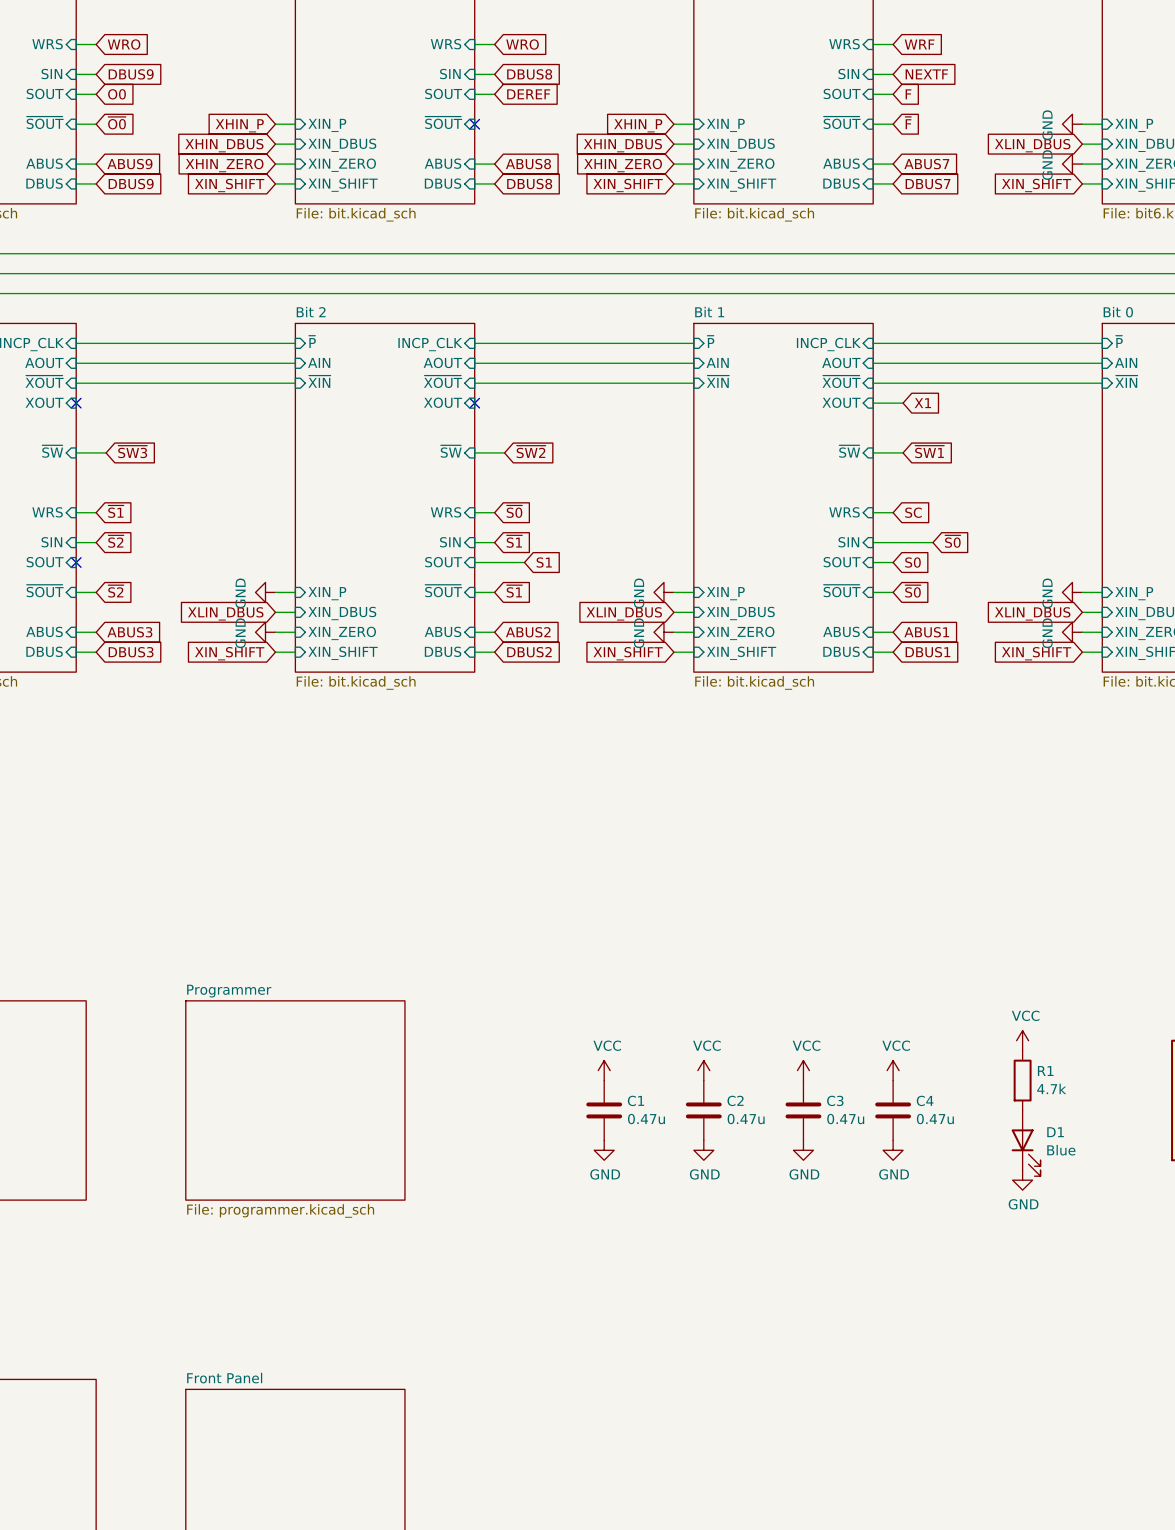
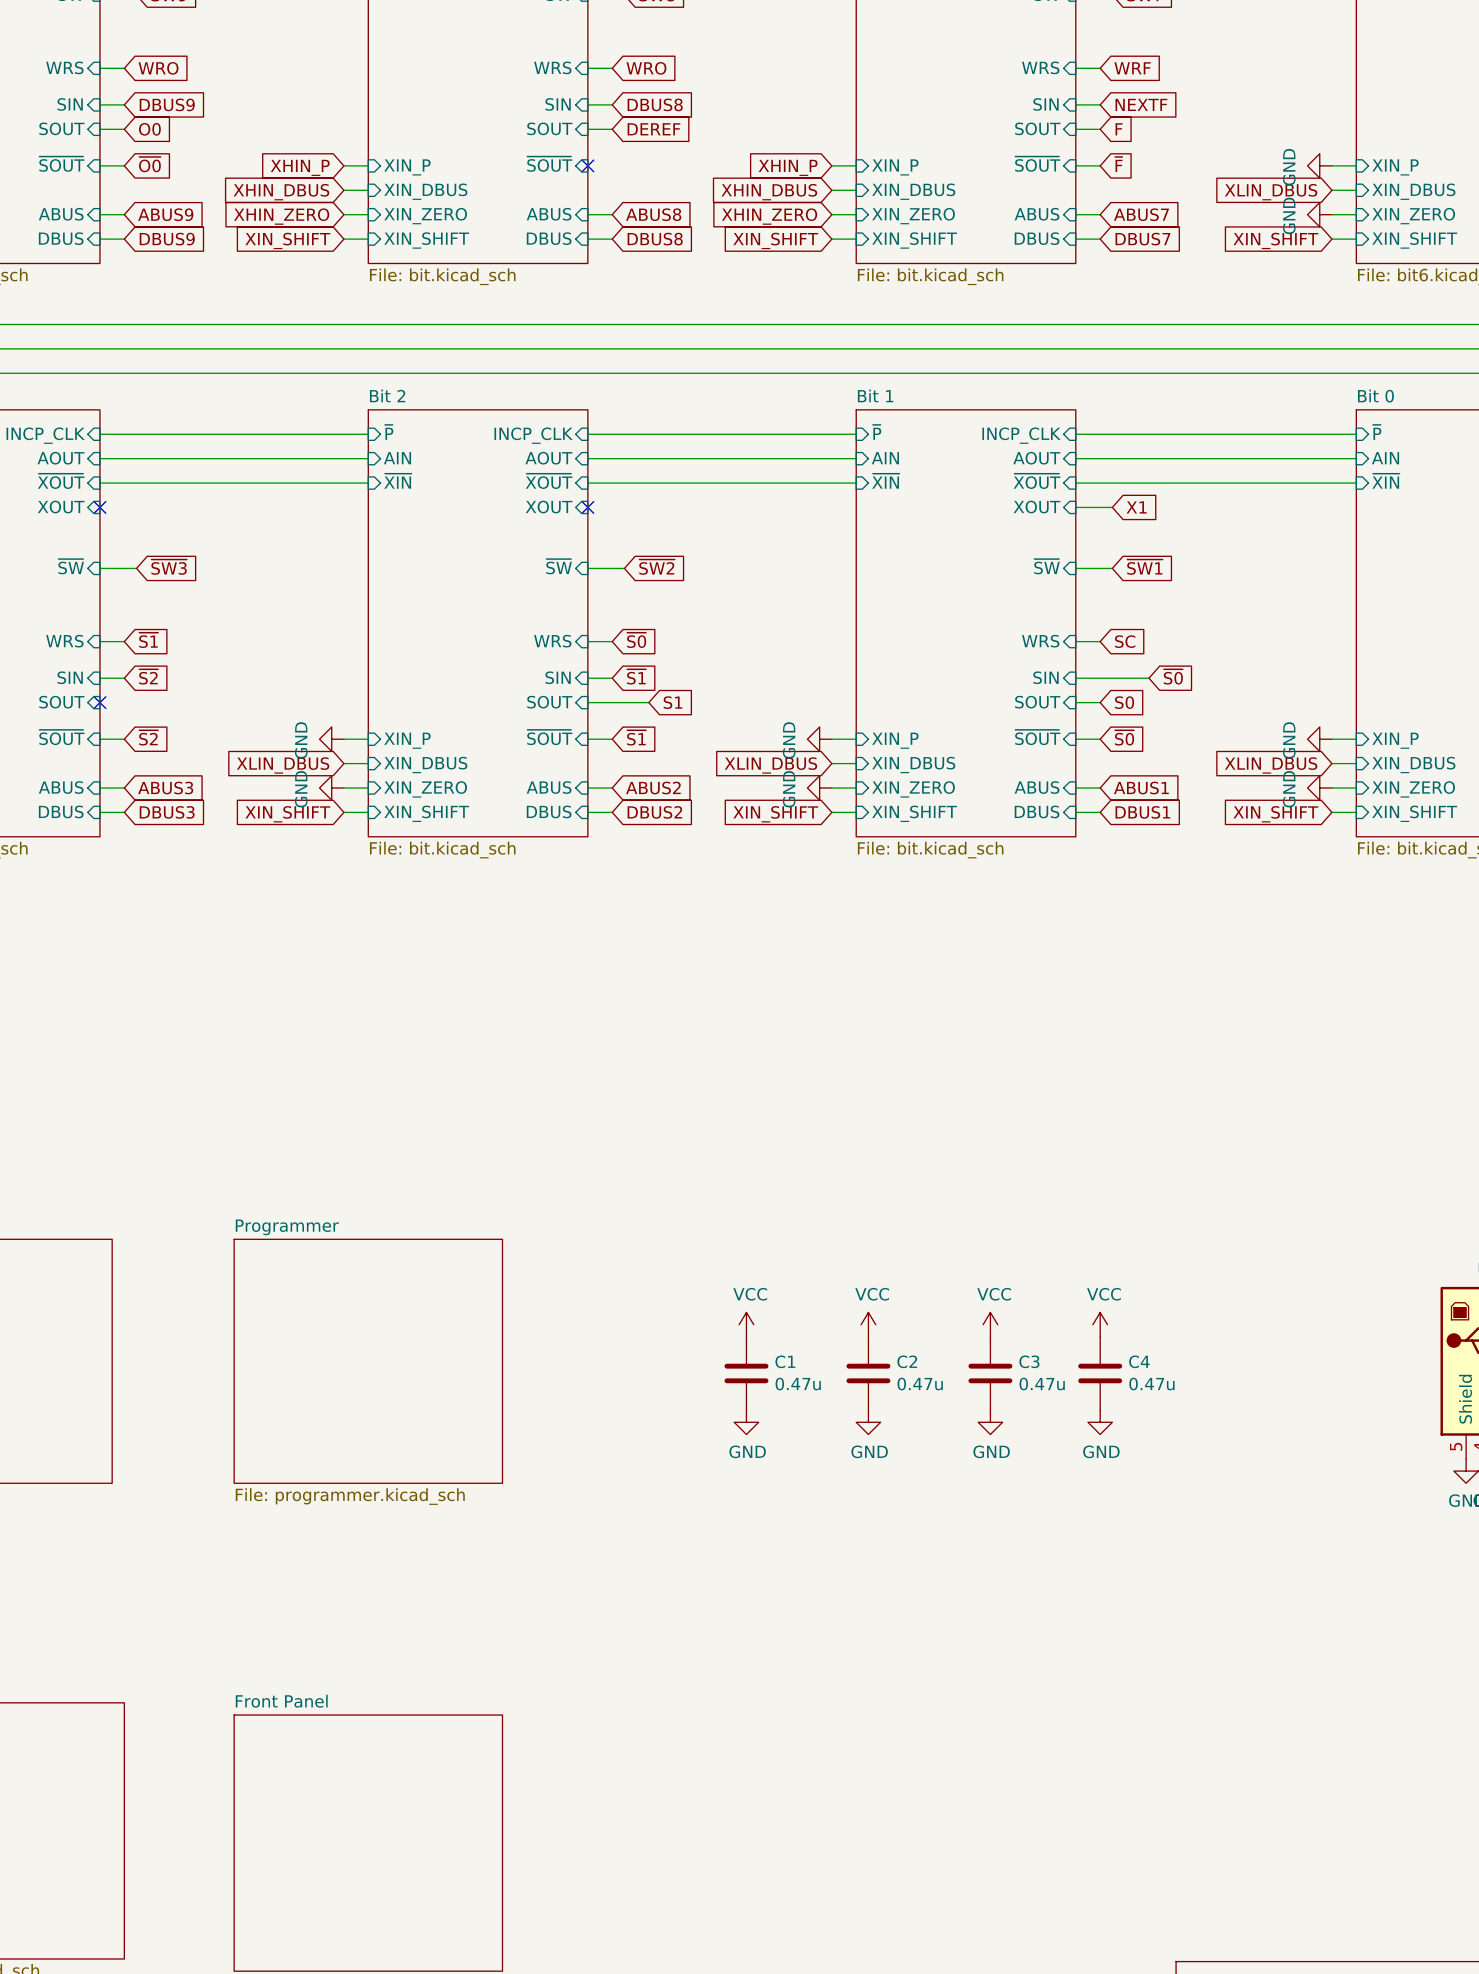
power symbol: VCC (1022, 1040) -> none
R1: 4.7k (1022, 1080) -> none
D1: Blue (1026, 1143) -> none
power symbol: GND (1022, 1180) -> none

